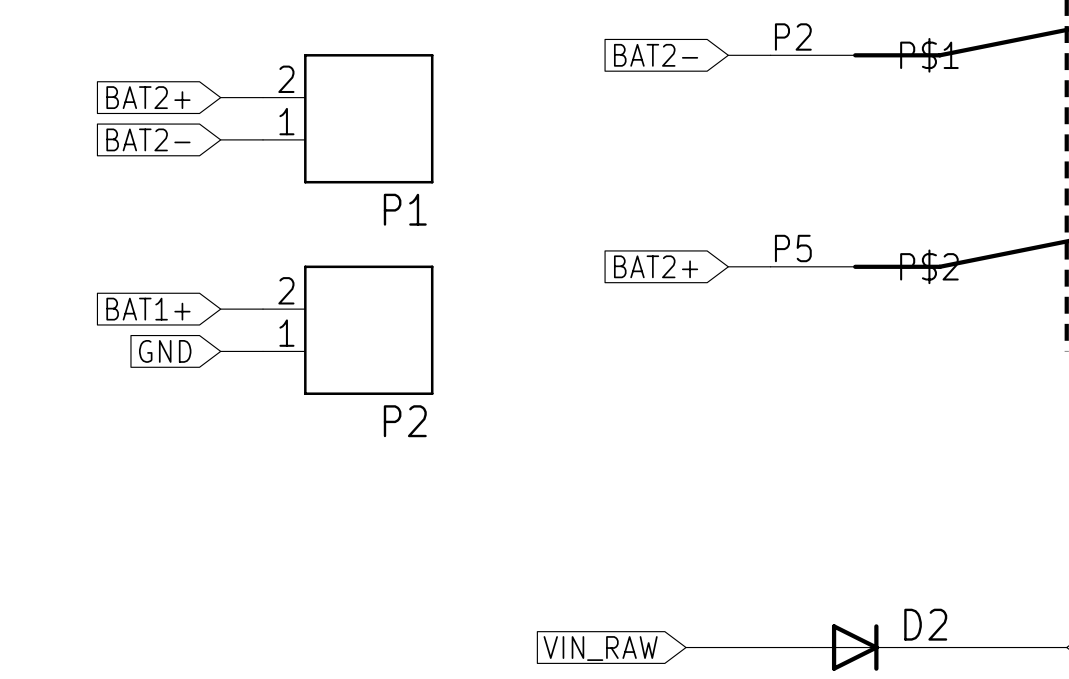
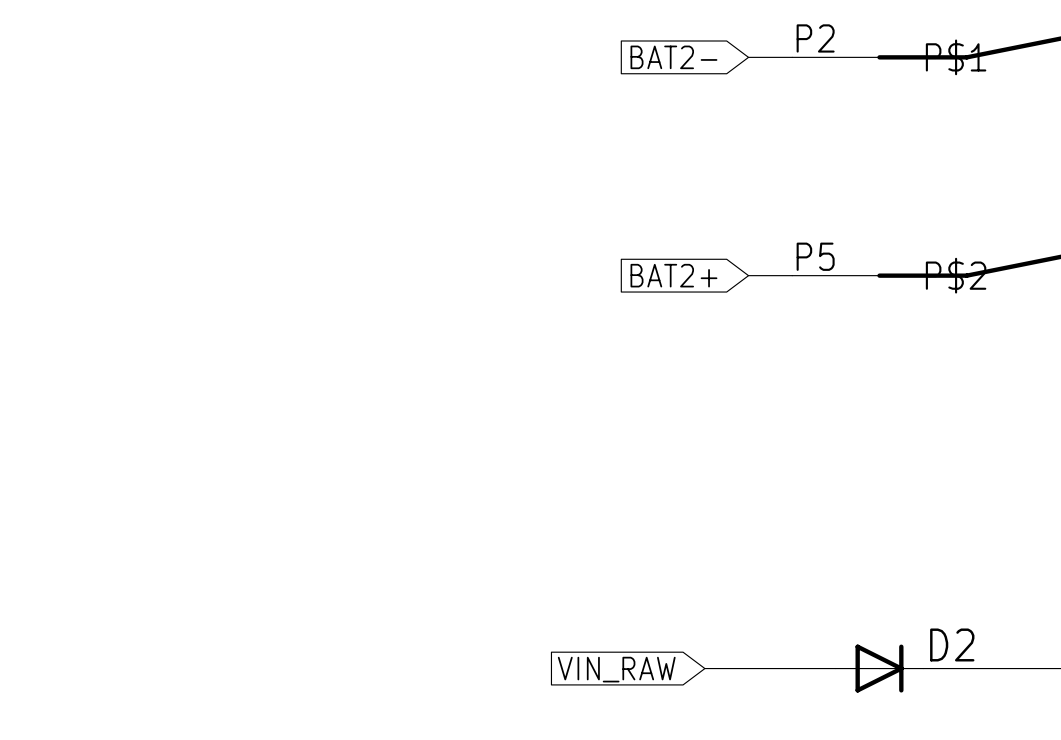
global label: BAT2+ (148, 97) -> none
wire: (220, 97) (263, 97) -> none
P1: (348, 118) -> none
global label: BAT2- (148, 139) -> none
wire: (220, 139) (263, 139) -> none
global label: BAT1+ (148, 309) -> none
wire: (220, 309) (263, 309) -> none
P2: (348, 330) -> none
global label: GND (165, 351) -> none
wire: (220, 351) (263, 351) -> none

